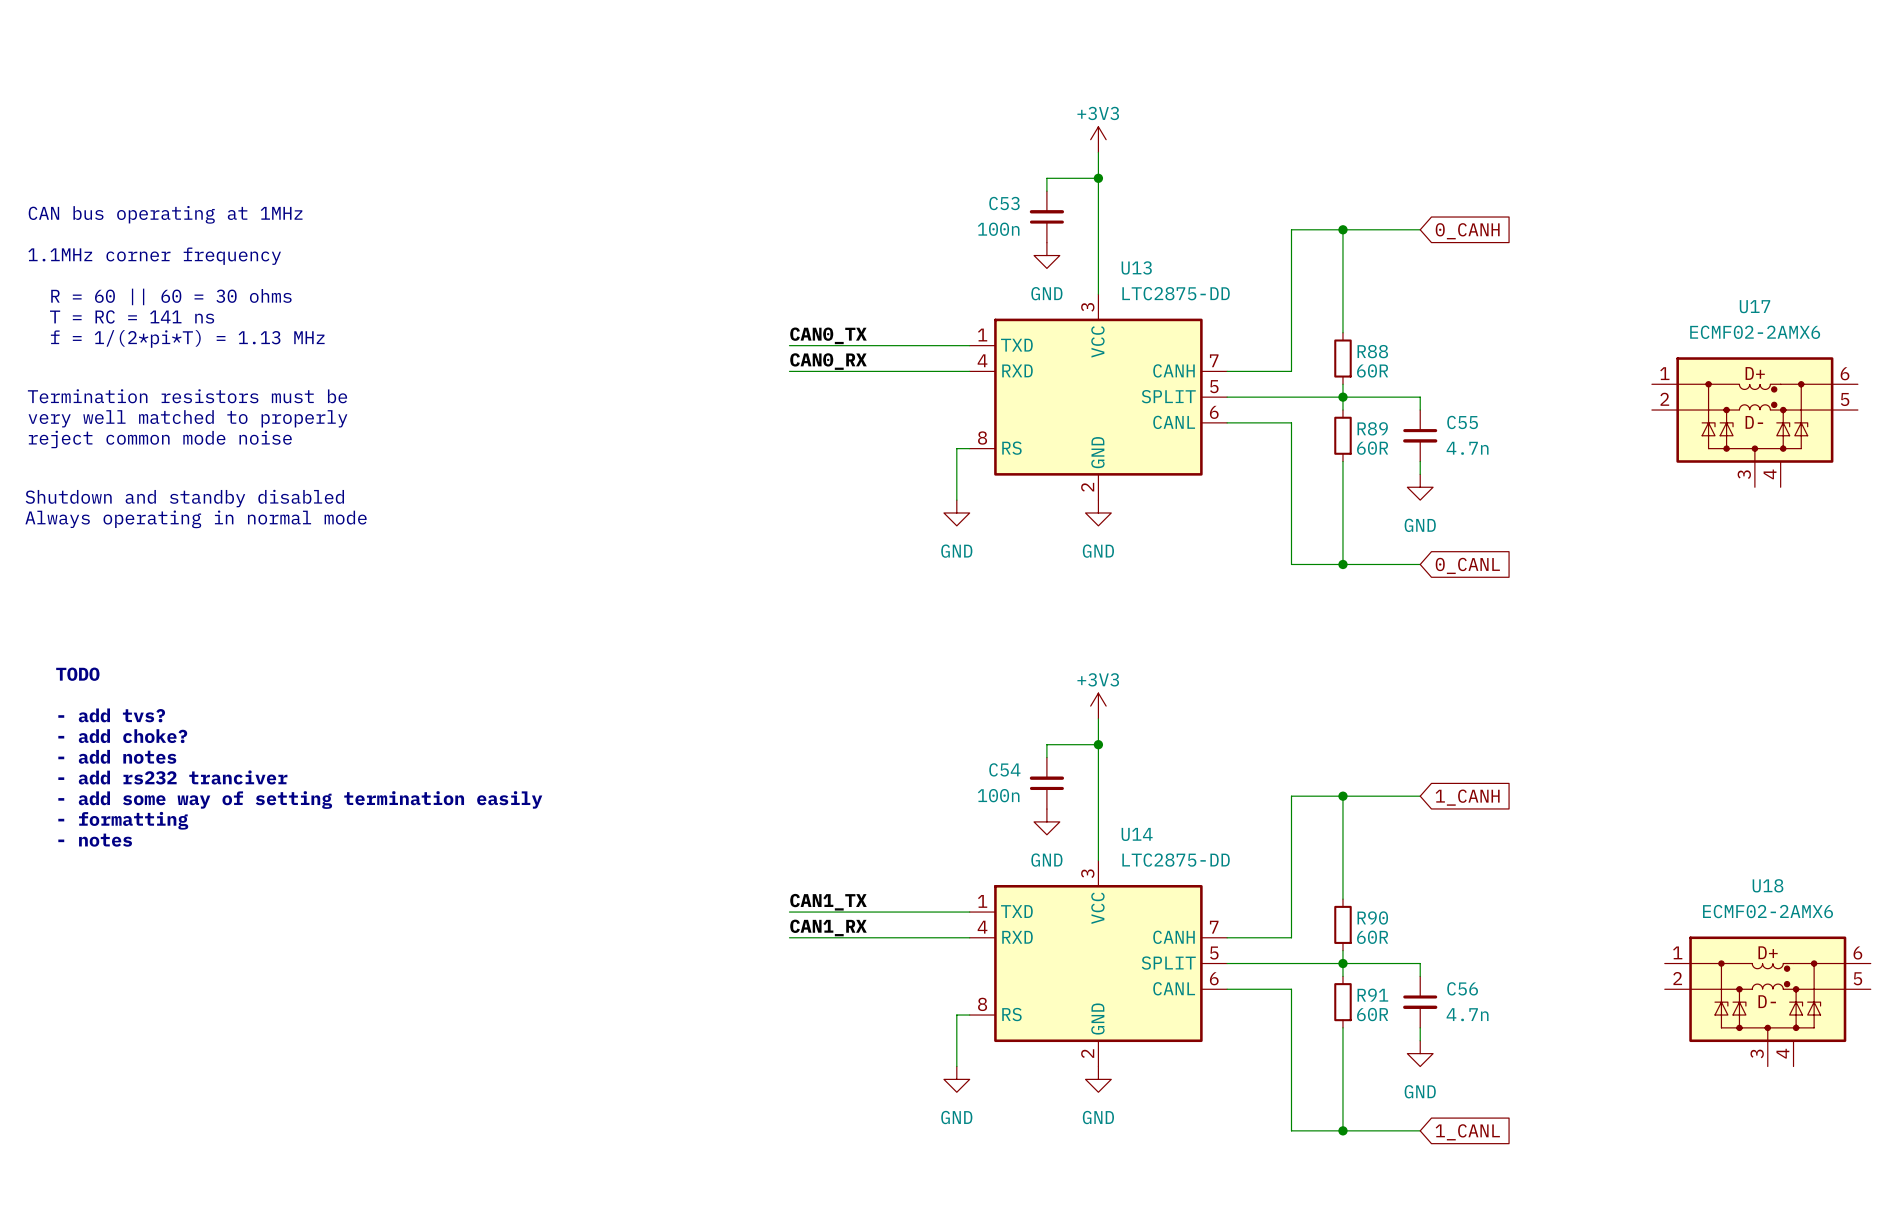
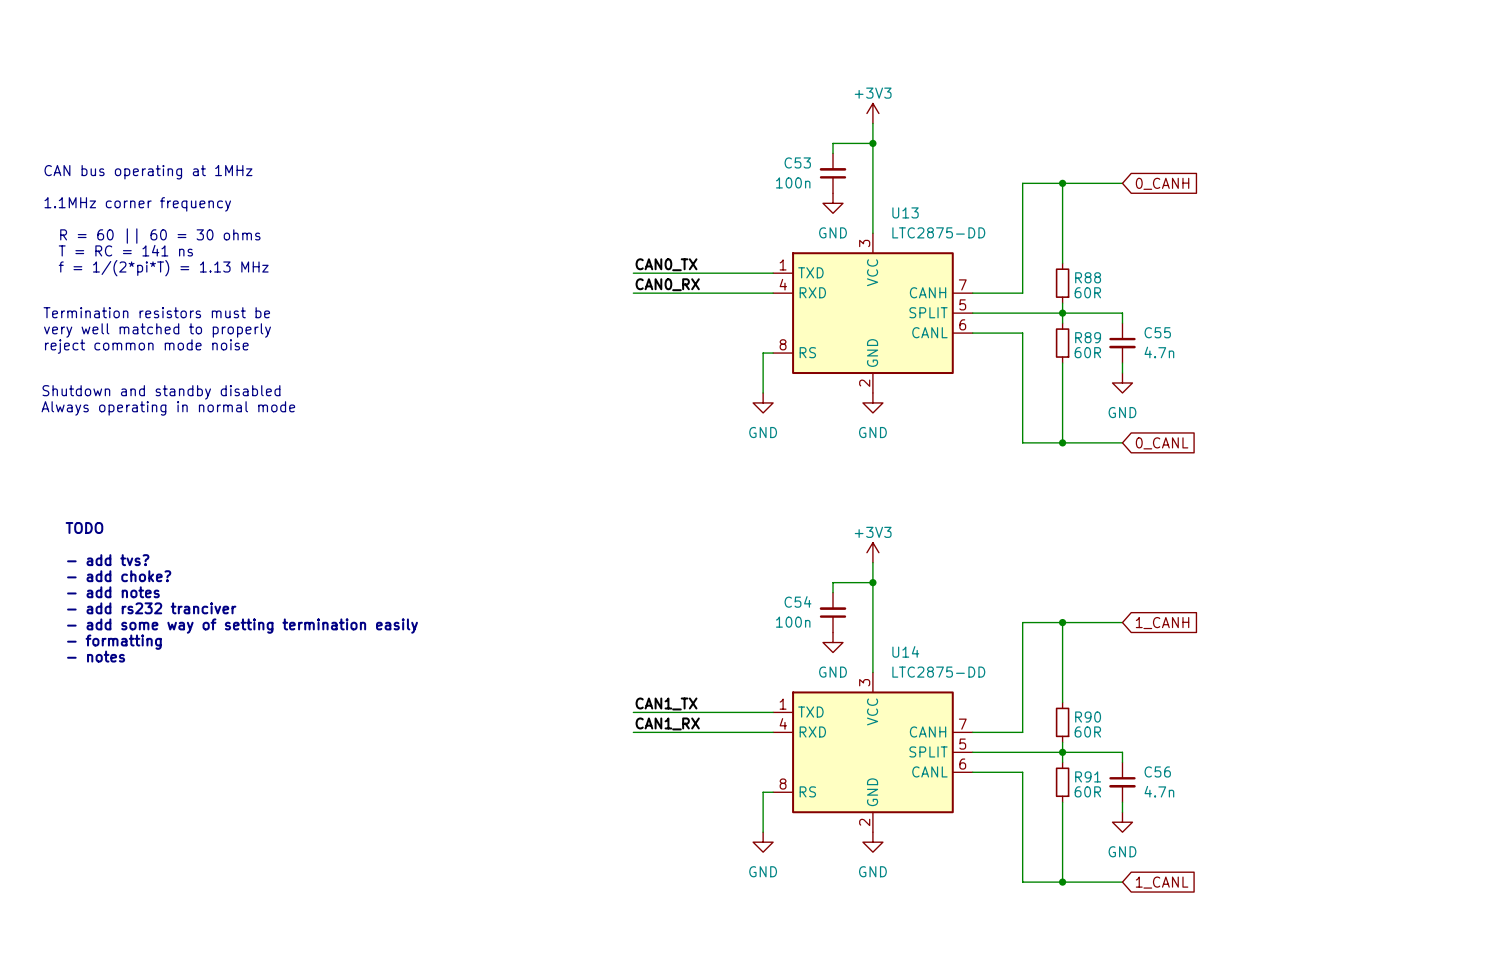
U17: ECMF02-2AMX6 (1754, 422) -> none
U18: ECMF02-2AMX6 (1767, 1001) -> none

